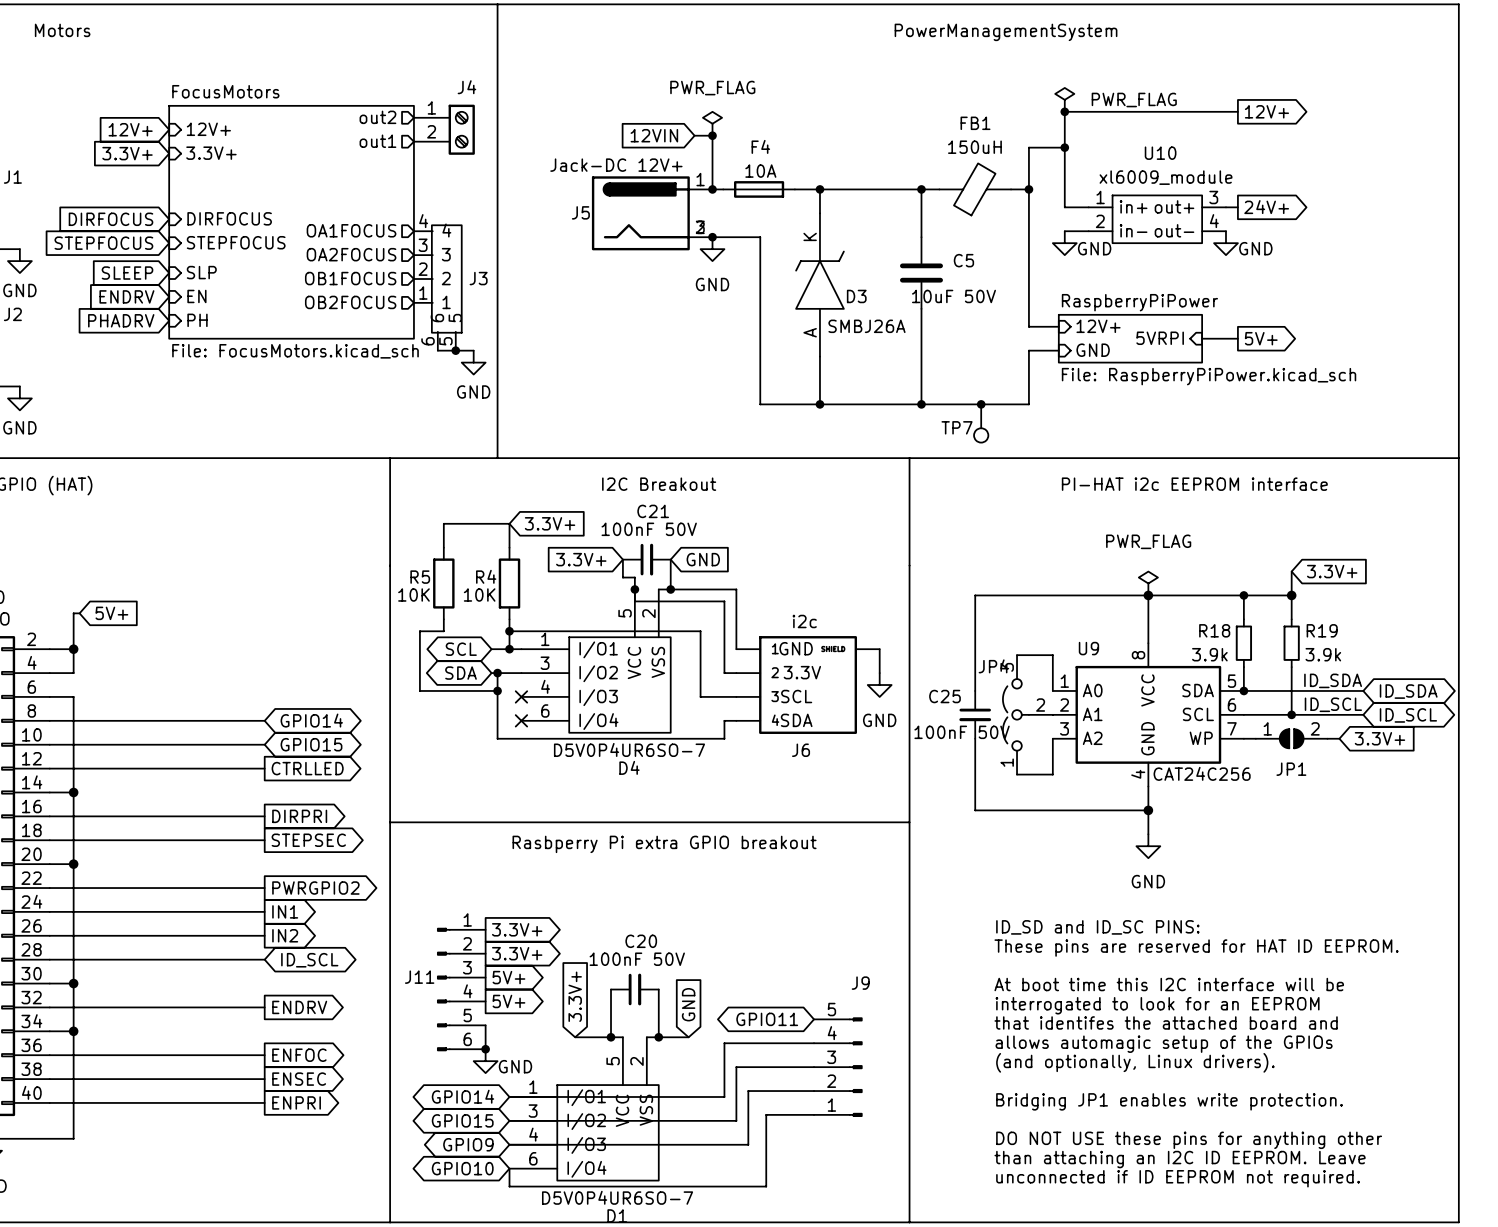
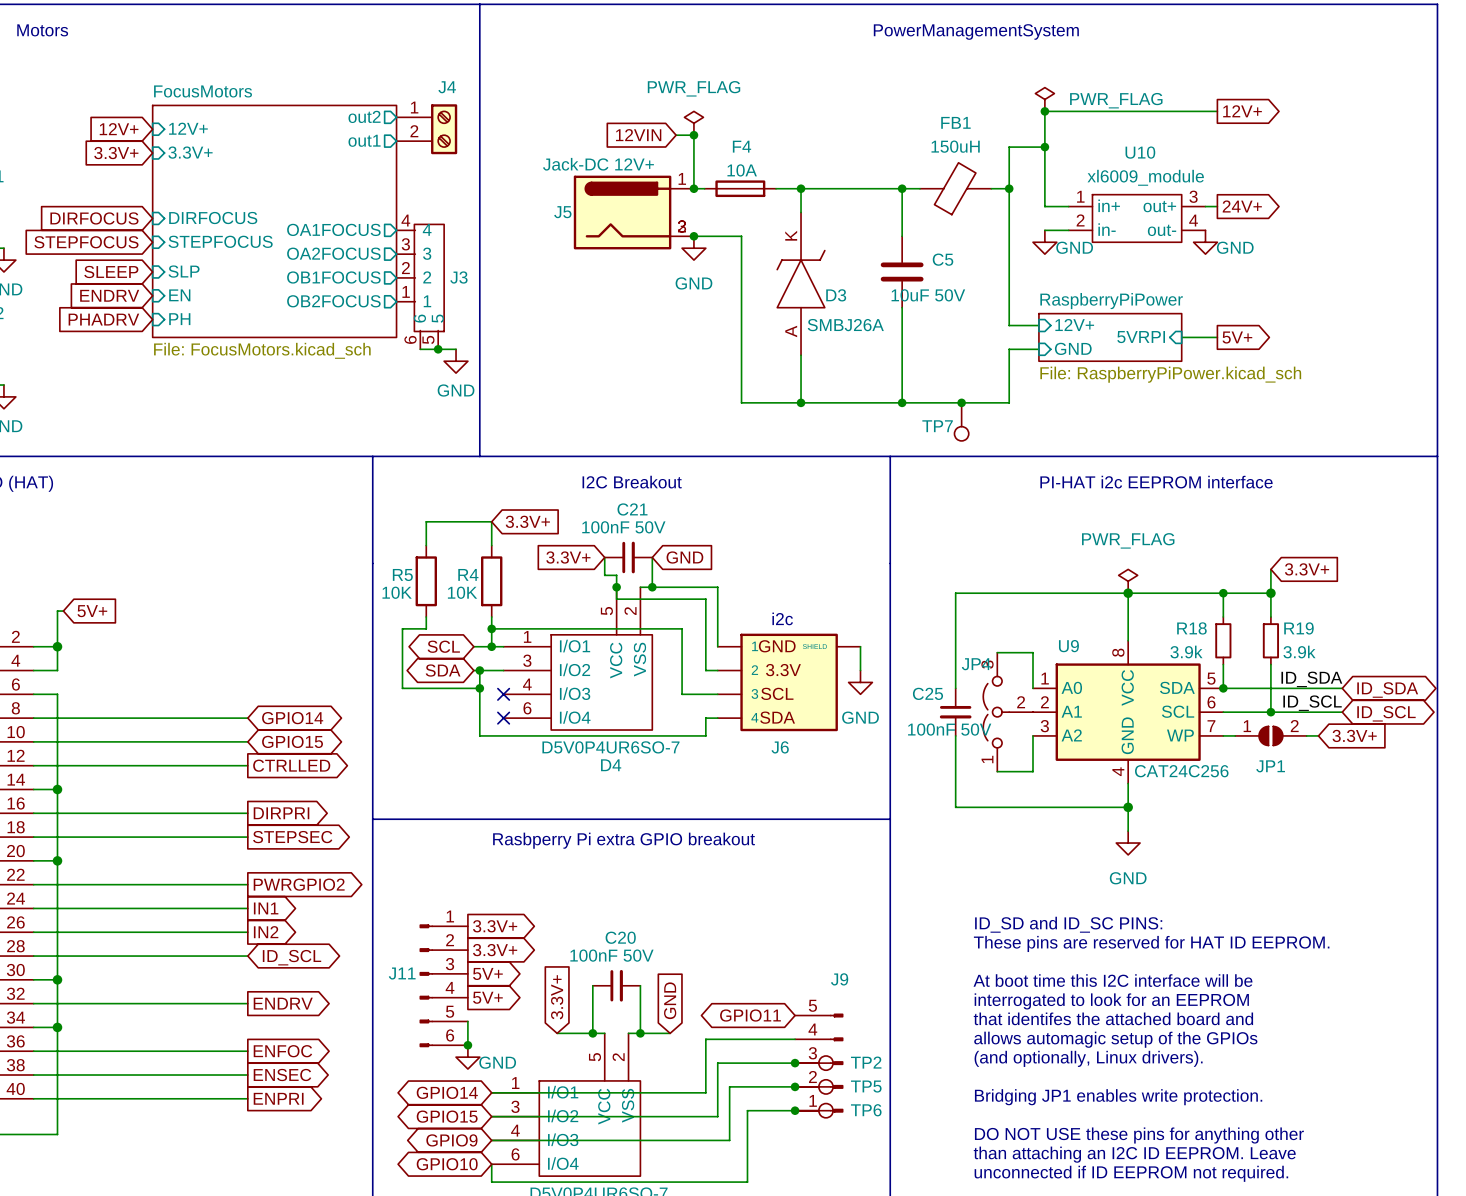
junction: none -> (795, 1063)
TP2: none -> (814, 1063)
junction: none -> (795, 1086)
TP5: none -> (814, 1086)
junction: none -> (795, 1110)
TP6: none -> (814, 1110)

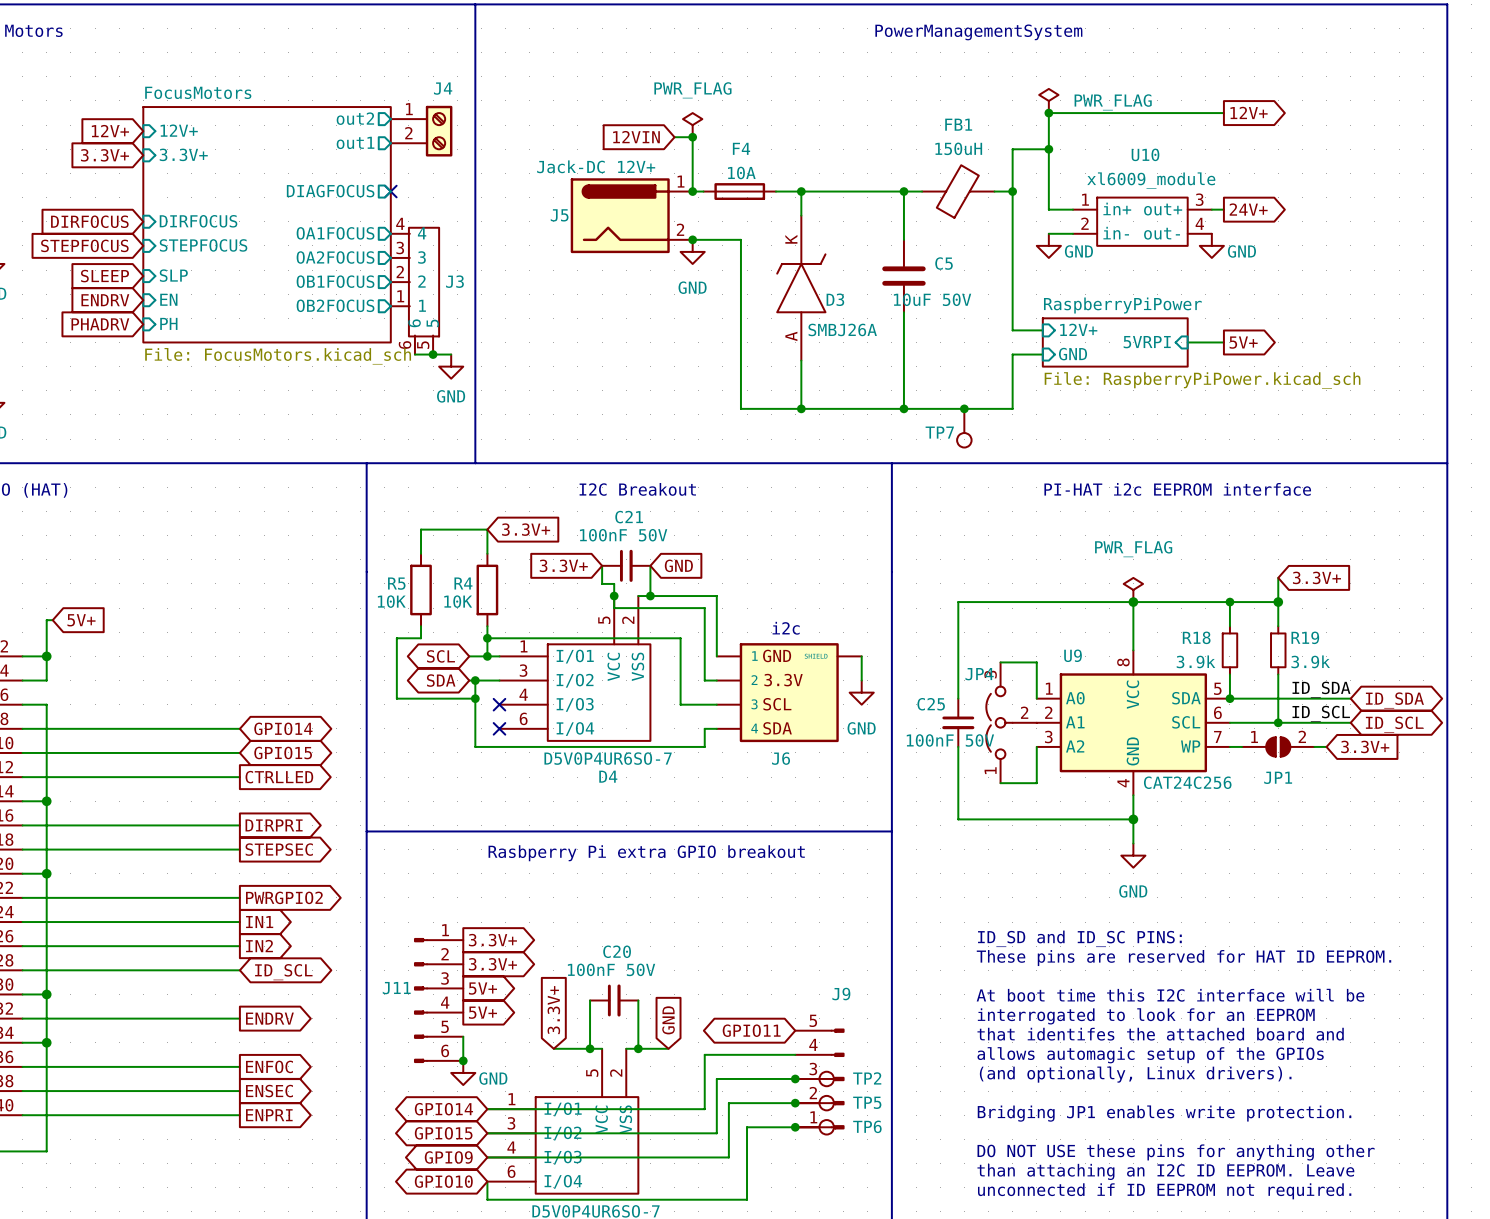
J5 symbol: [573, 175, 694, 250] -> [570, 178, 693, 254]
sheet pin: none -> DIAGFOCUS (330, 191)
no-connect mark: none -> (390, 191)

